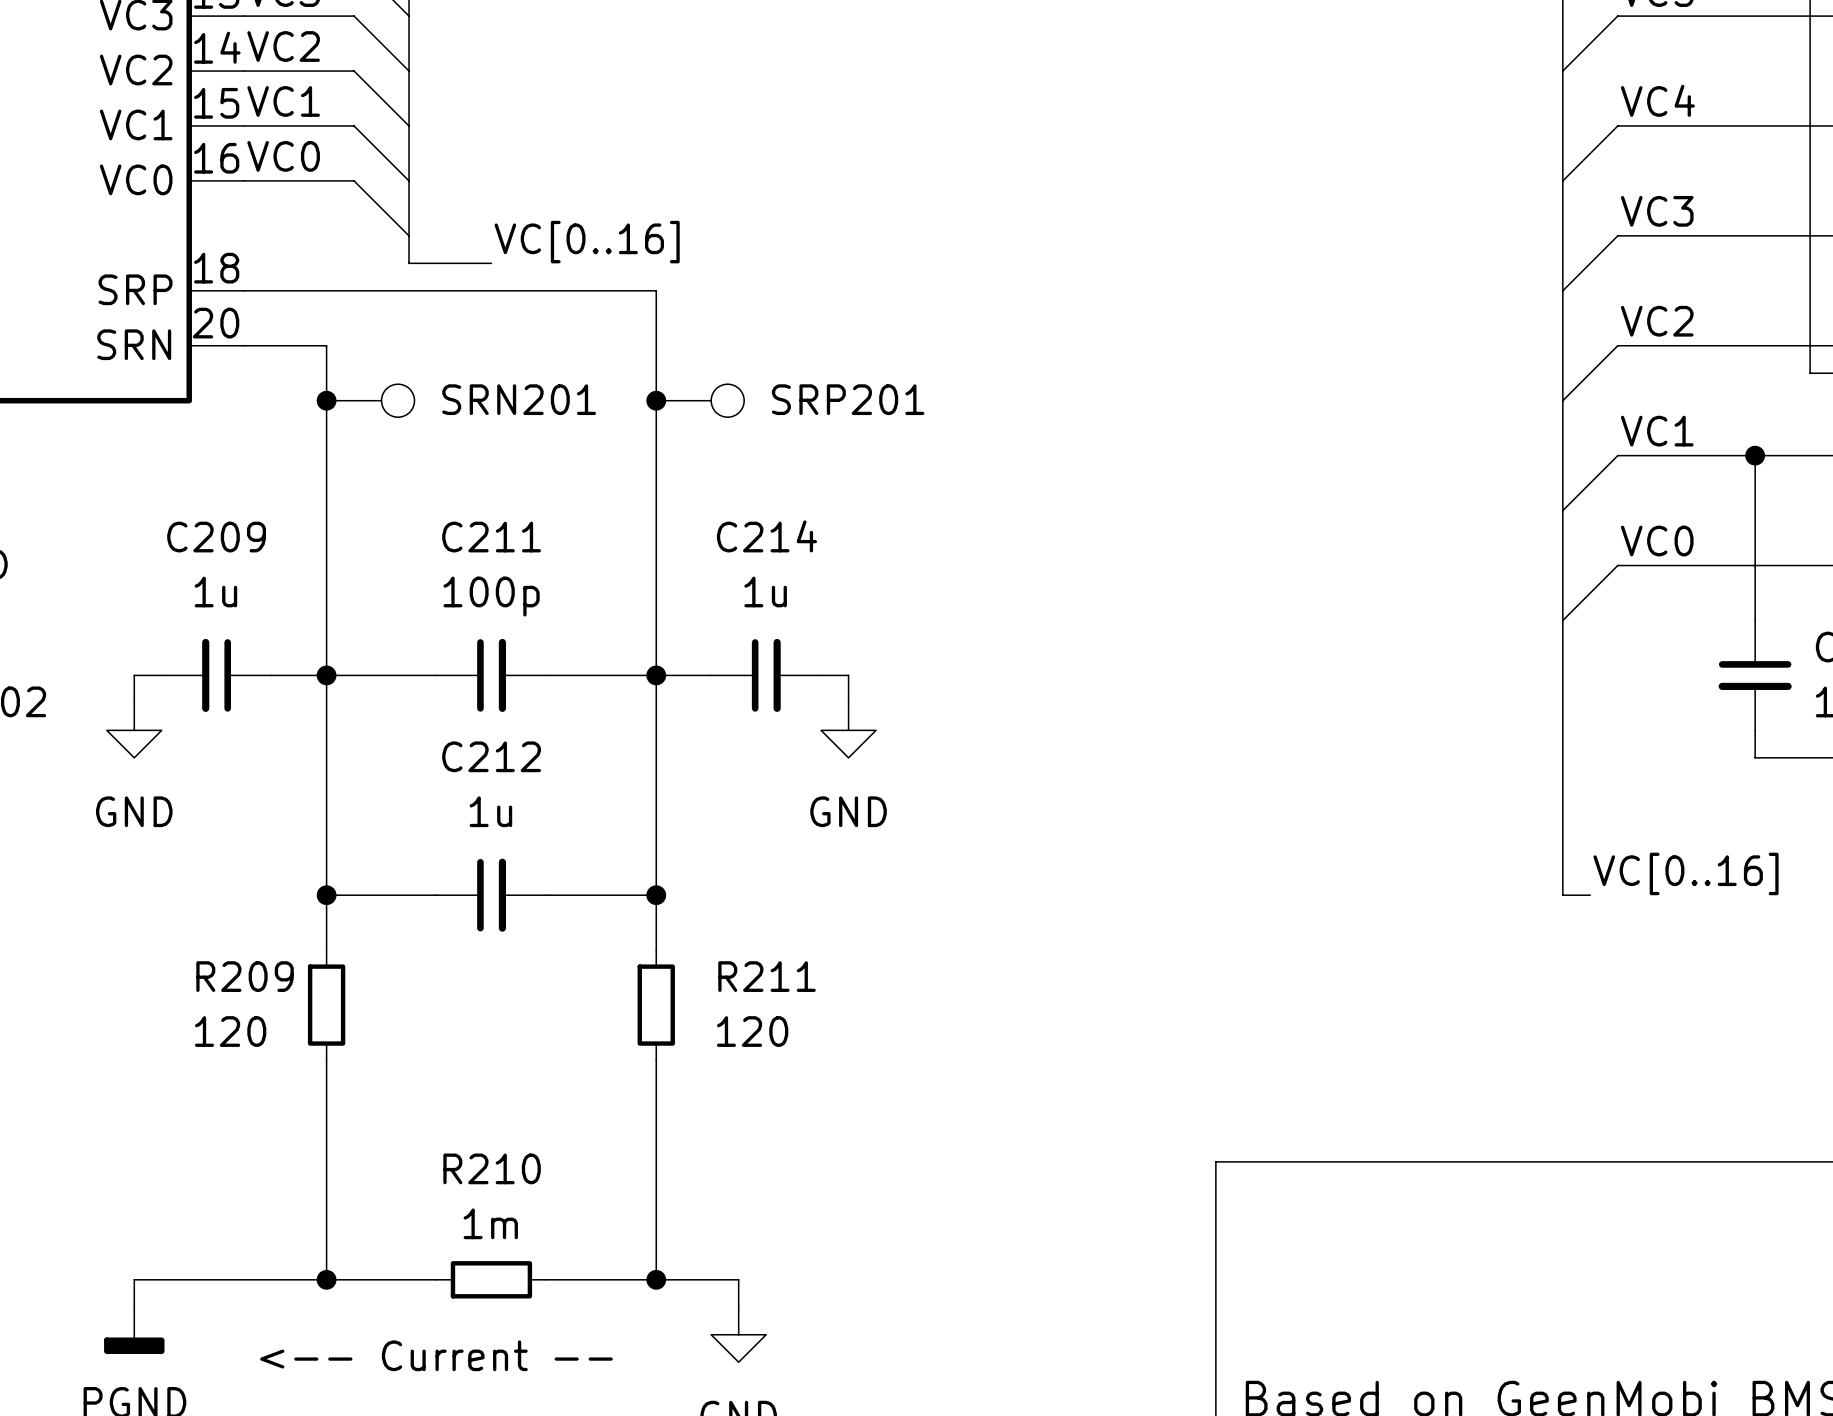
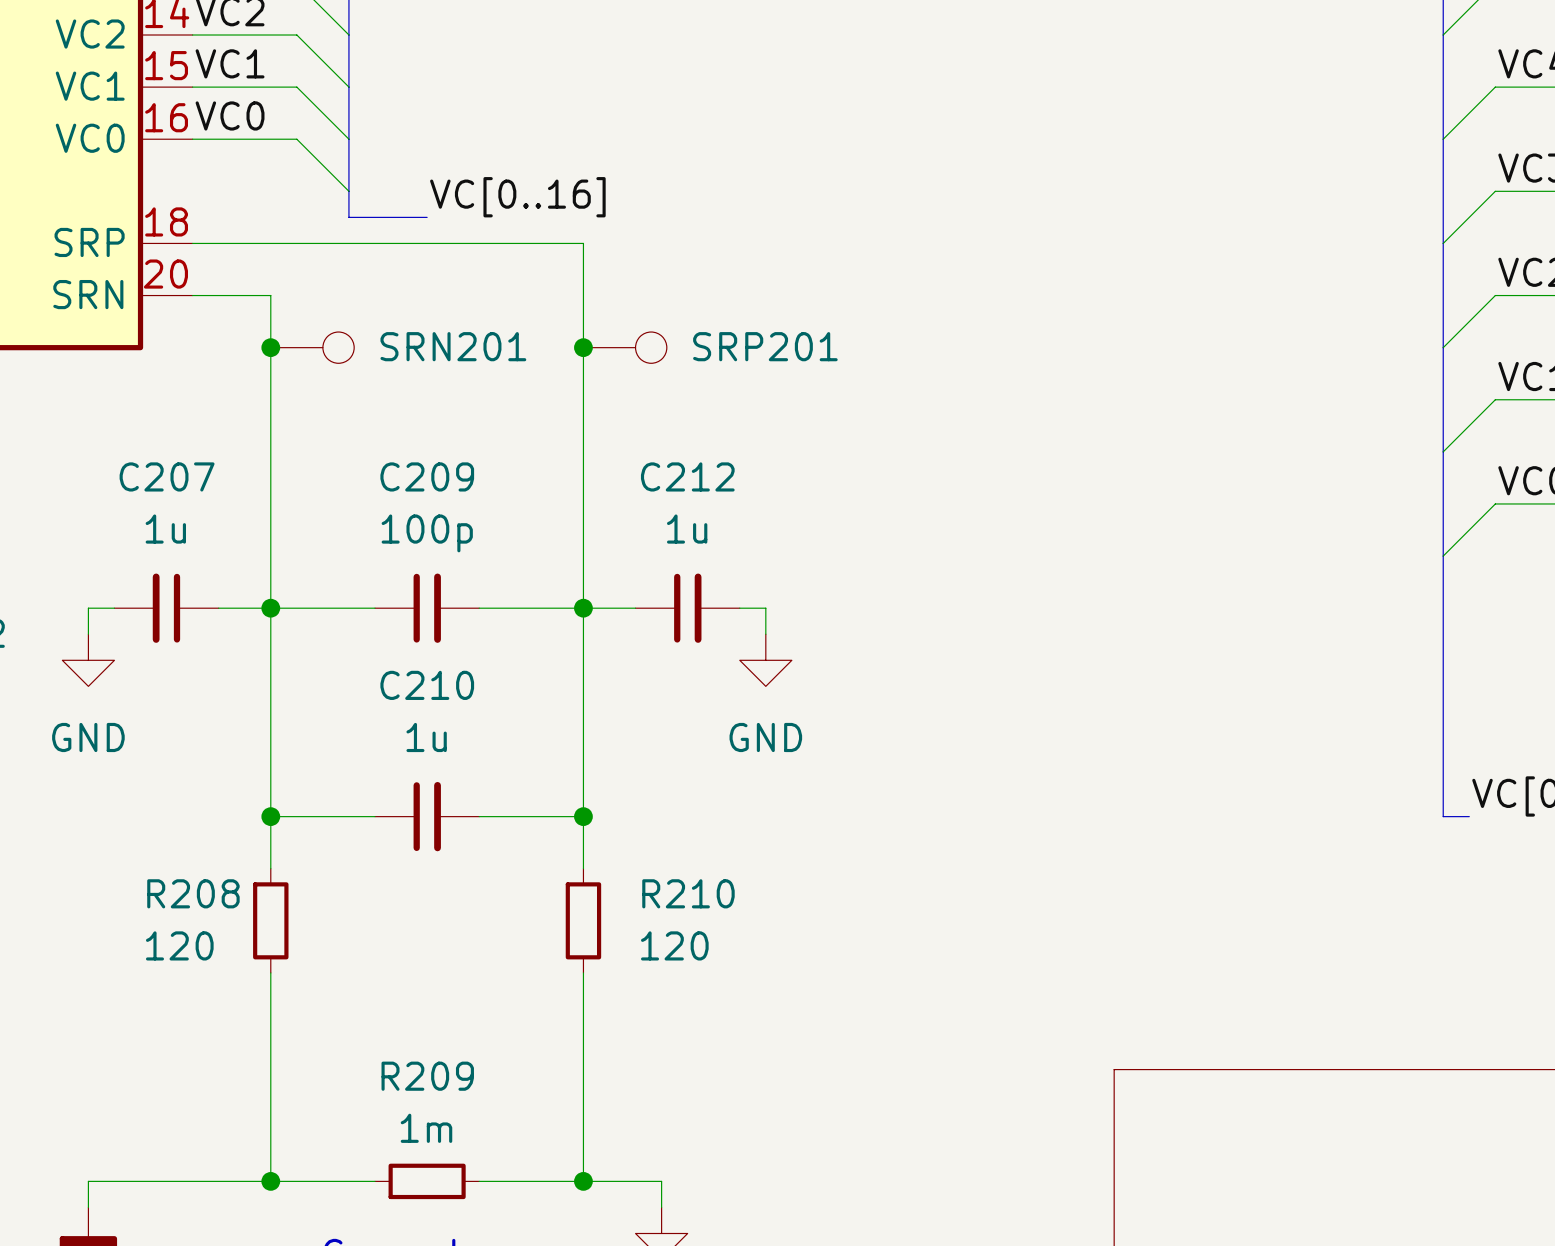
C214 name: C214 (766, 536) -> C212 (687, 476)
C209 name: C209 (216, 537) -> C207 (167, 476)
C211 name: C211 (491, 537) -> C209 (427, 476)
C212 name: C212 (491, 756) -> C210 (427, 685)
R209 name: R209 (245, 976) -> R208 (193, 893)
R211 name: R211 (767, 976) -> R210 (688, 893)
R210 name: R210 (492, 1168) -> R209 (427, 1076)

